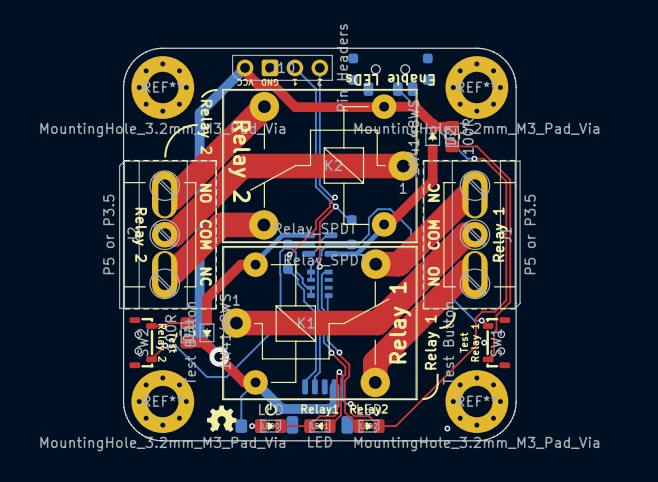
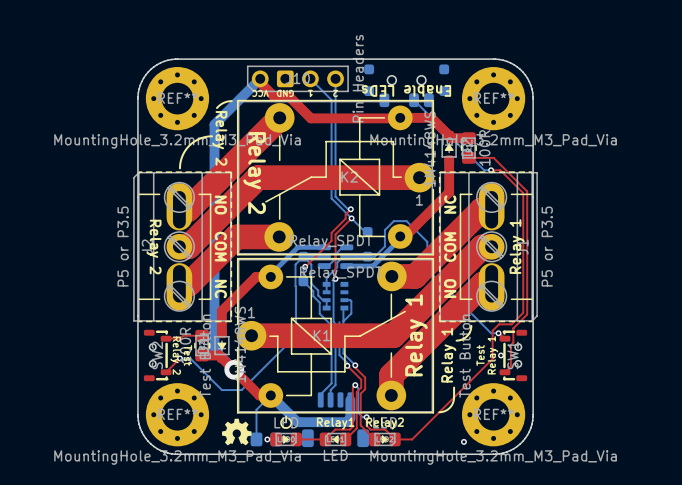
bottom track: (328, 272) (324, 272) (321, 274) (321, 307) (323, 309) -> none
bottom track: none -> (344, 300) (351, 301) (351, 313) (343, 321)

